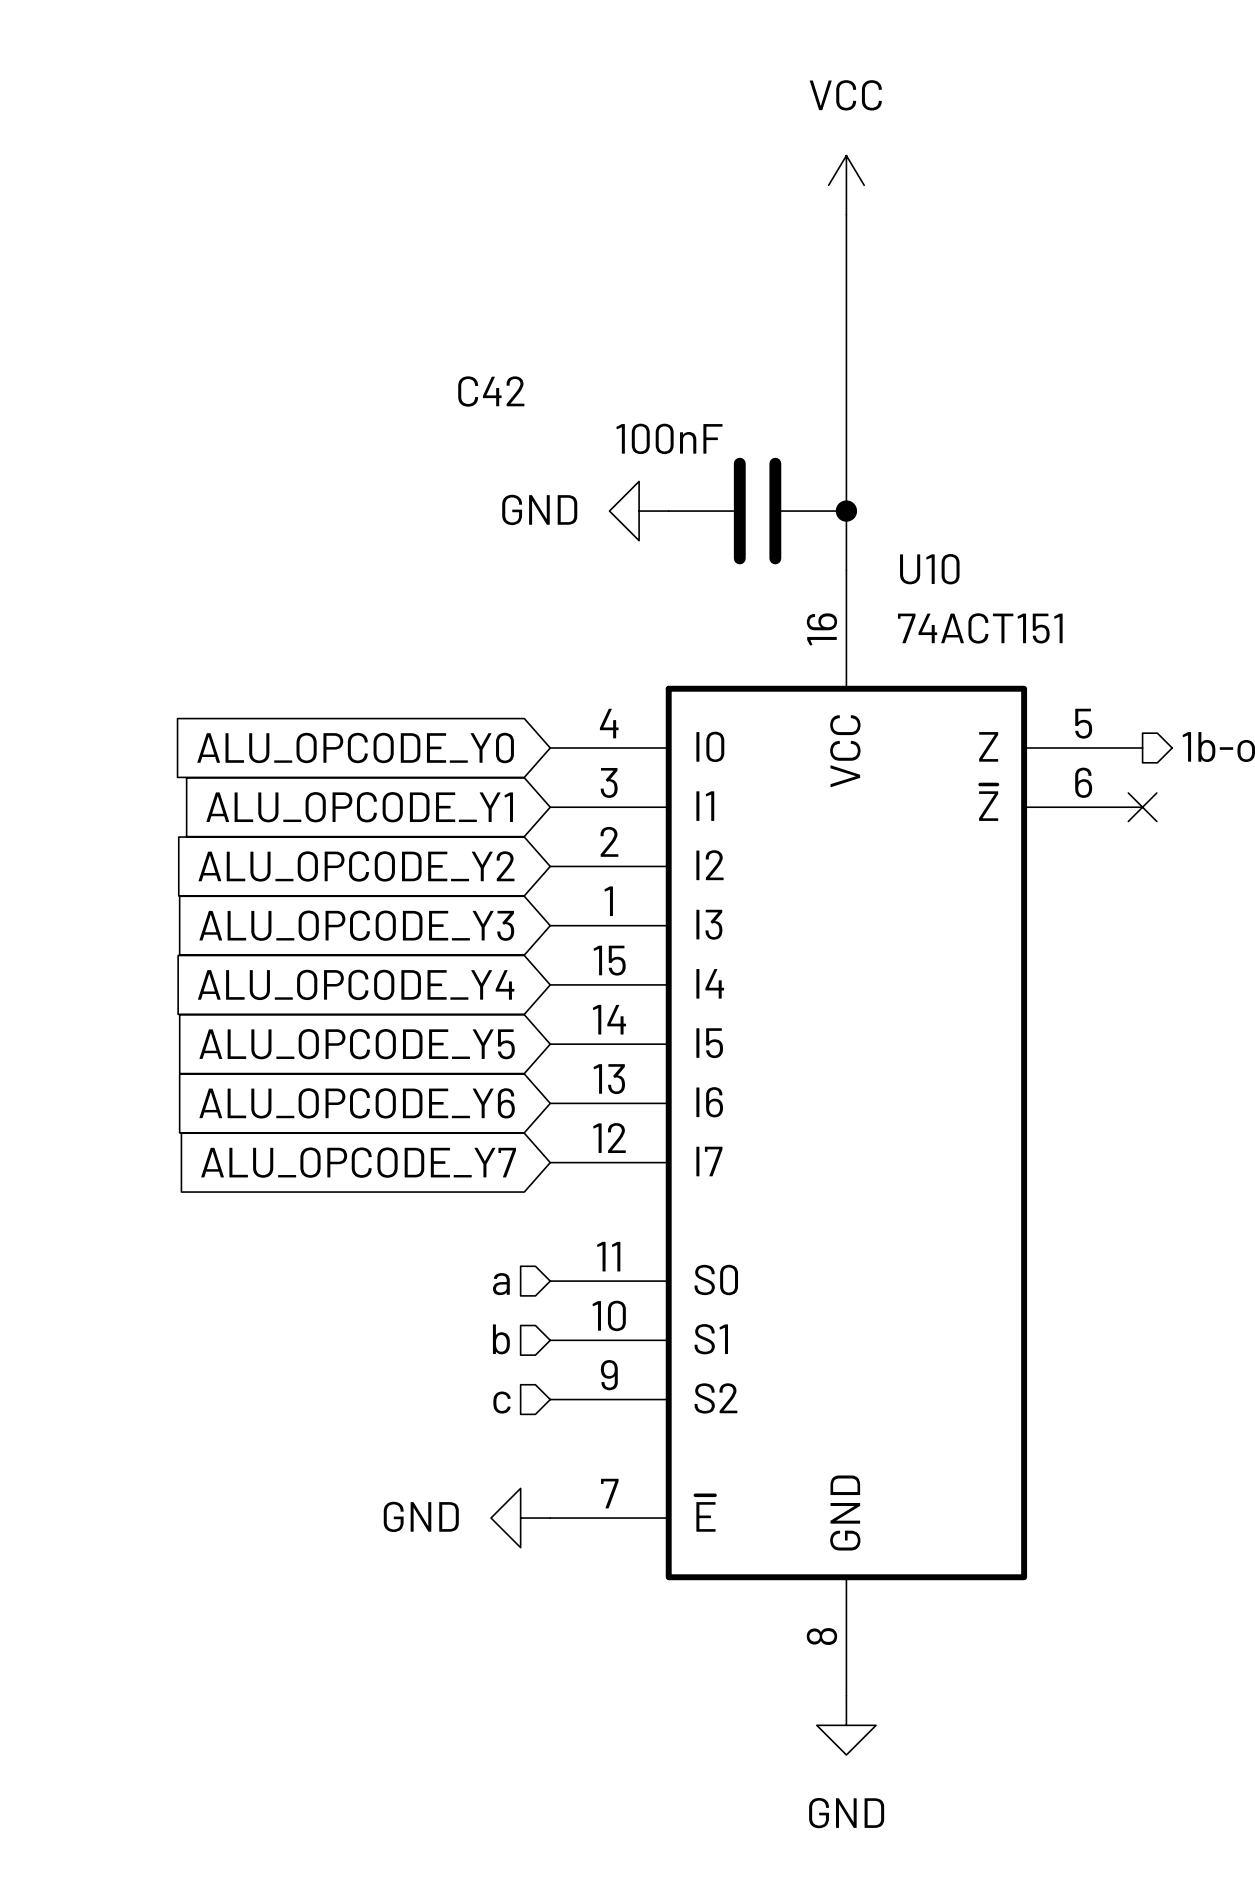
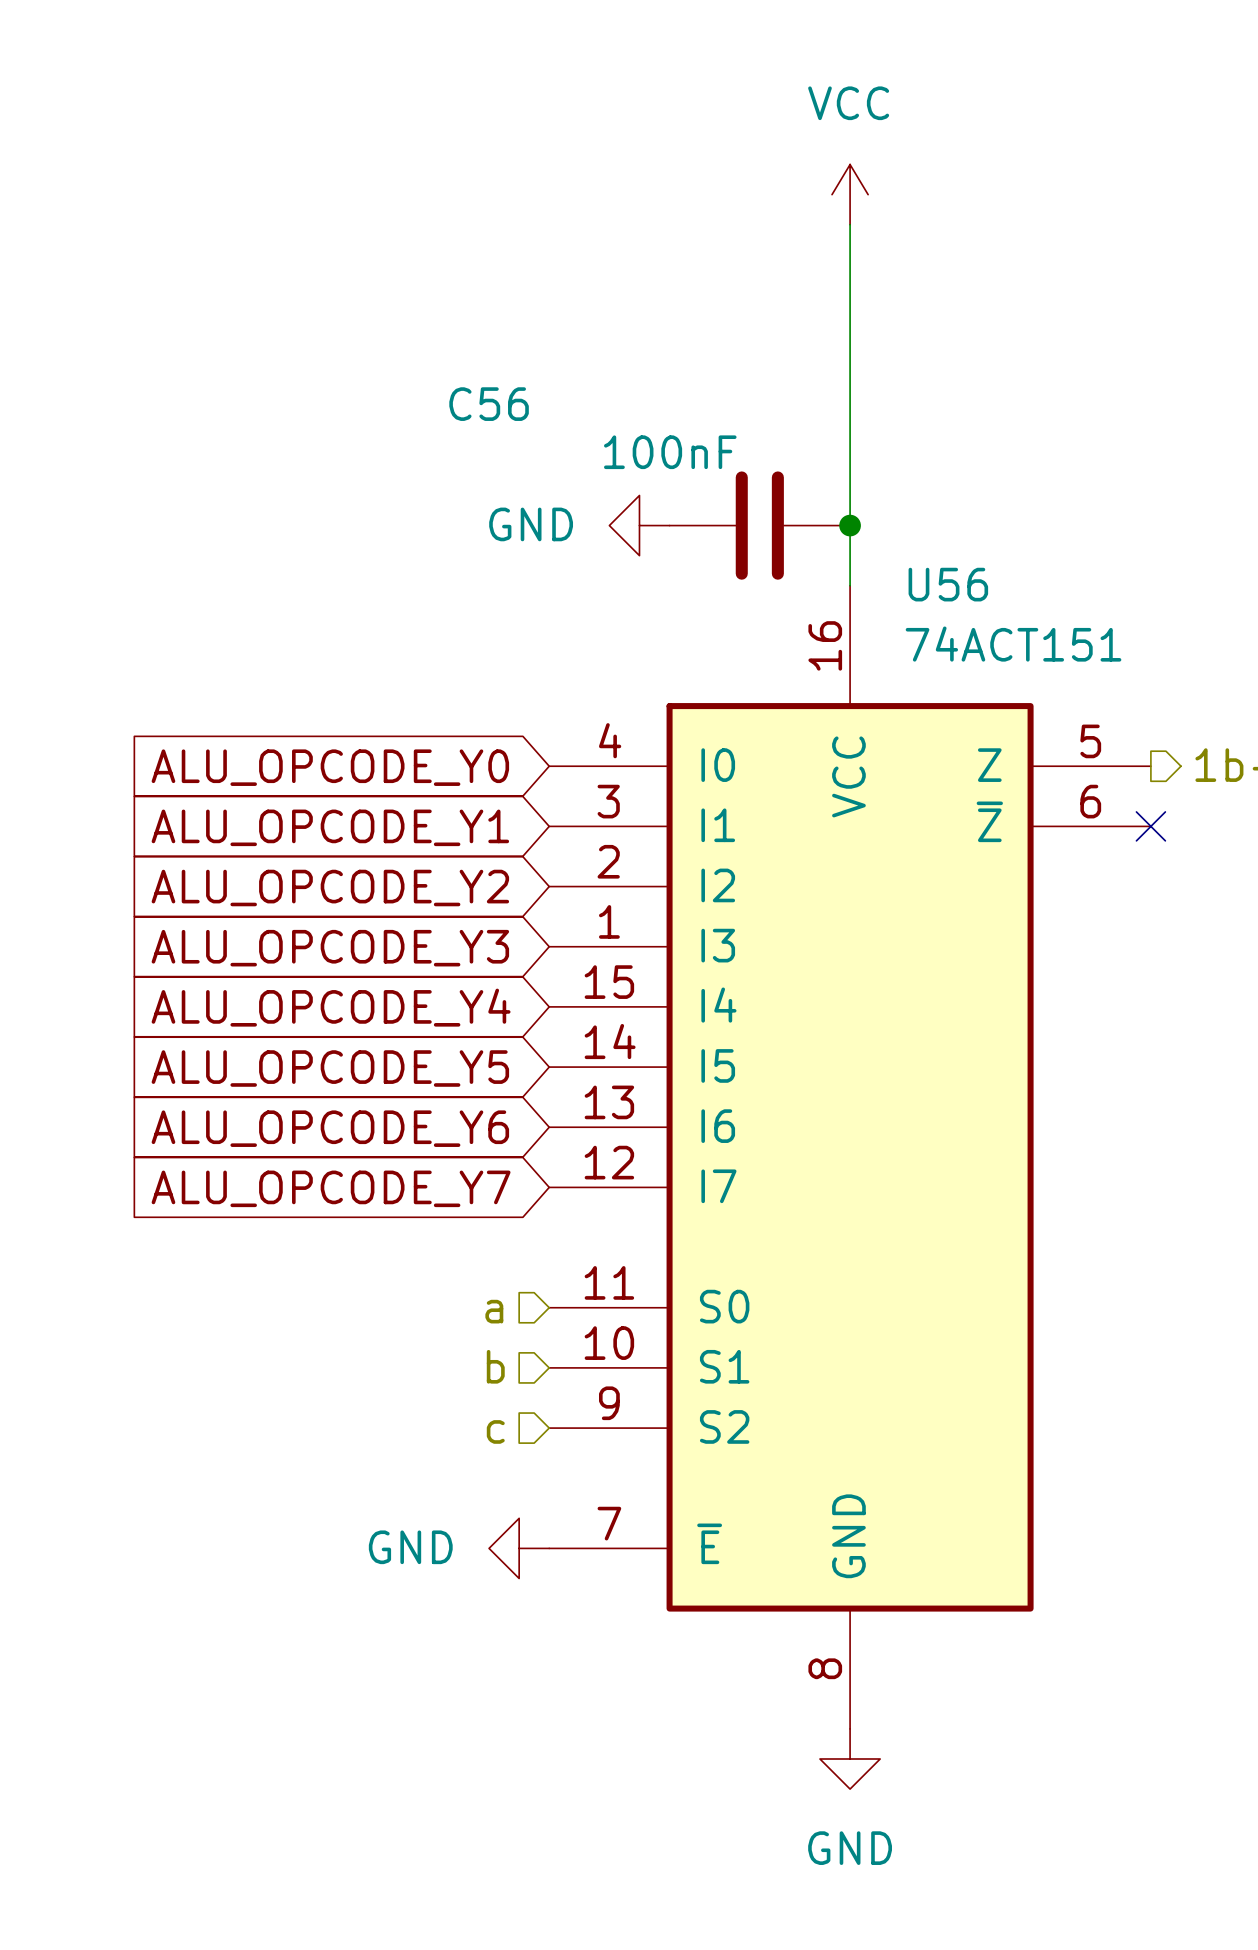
C42 name: C42 (491, 391) -> C56 (489, 404)
U10 name: U10 (929, 569) -> U56 (948, 584)

